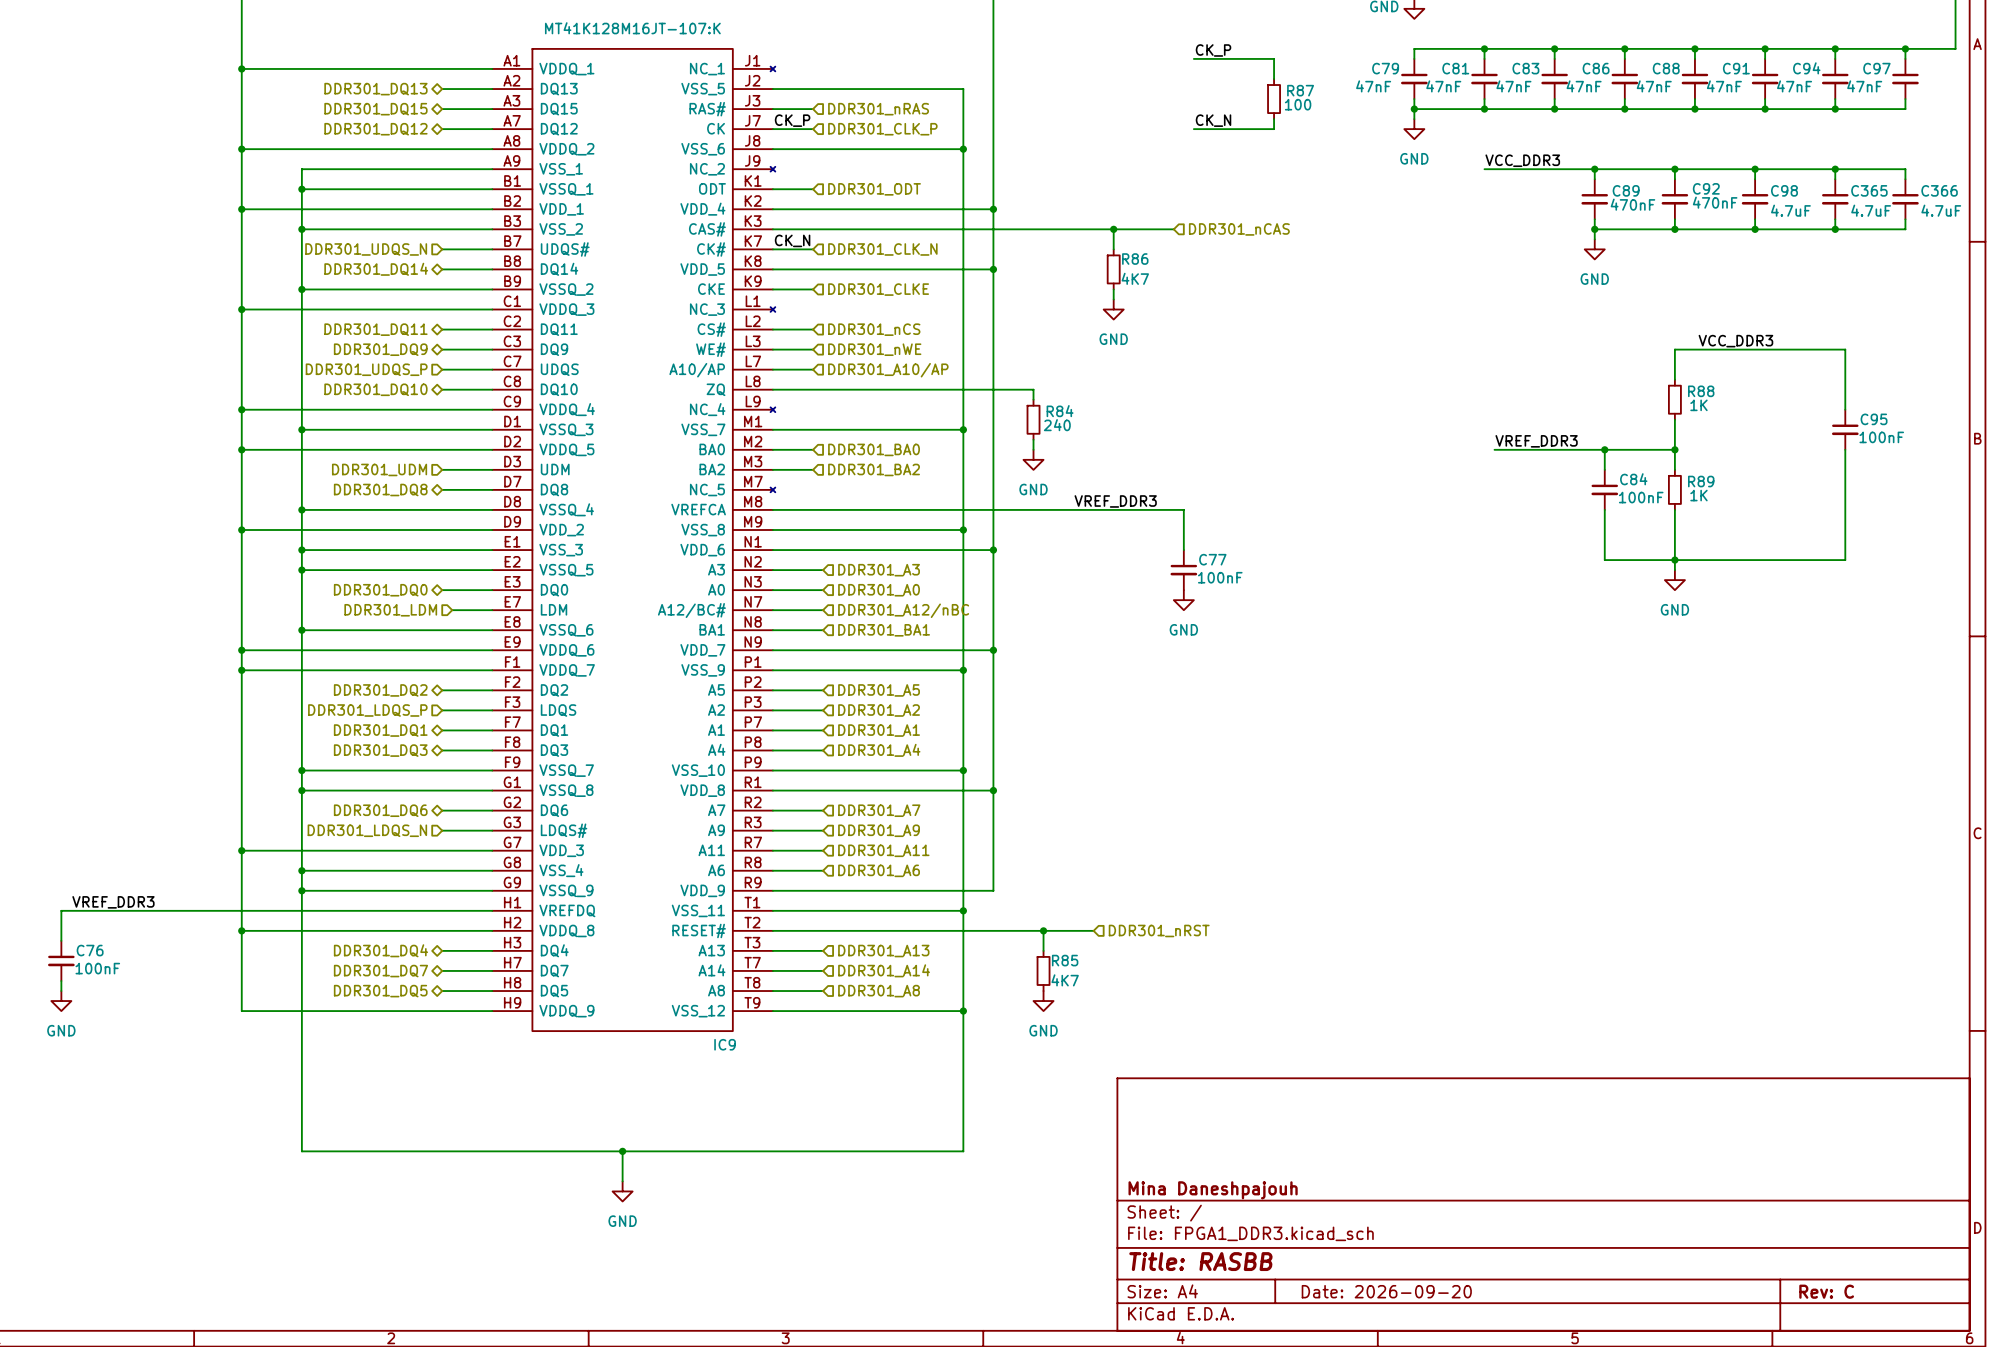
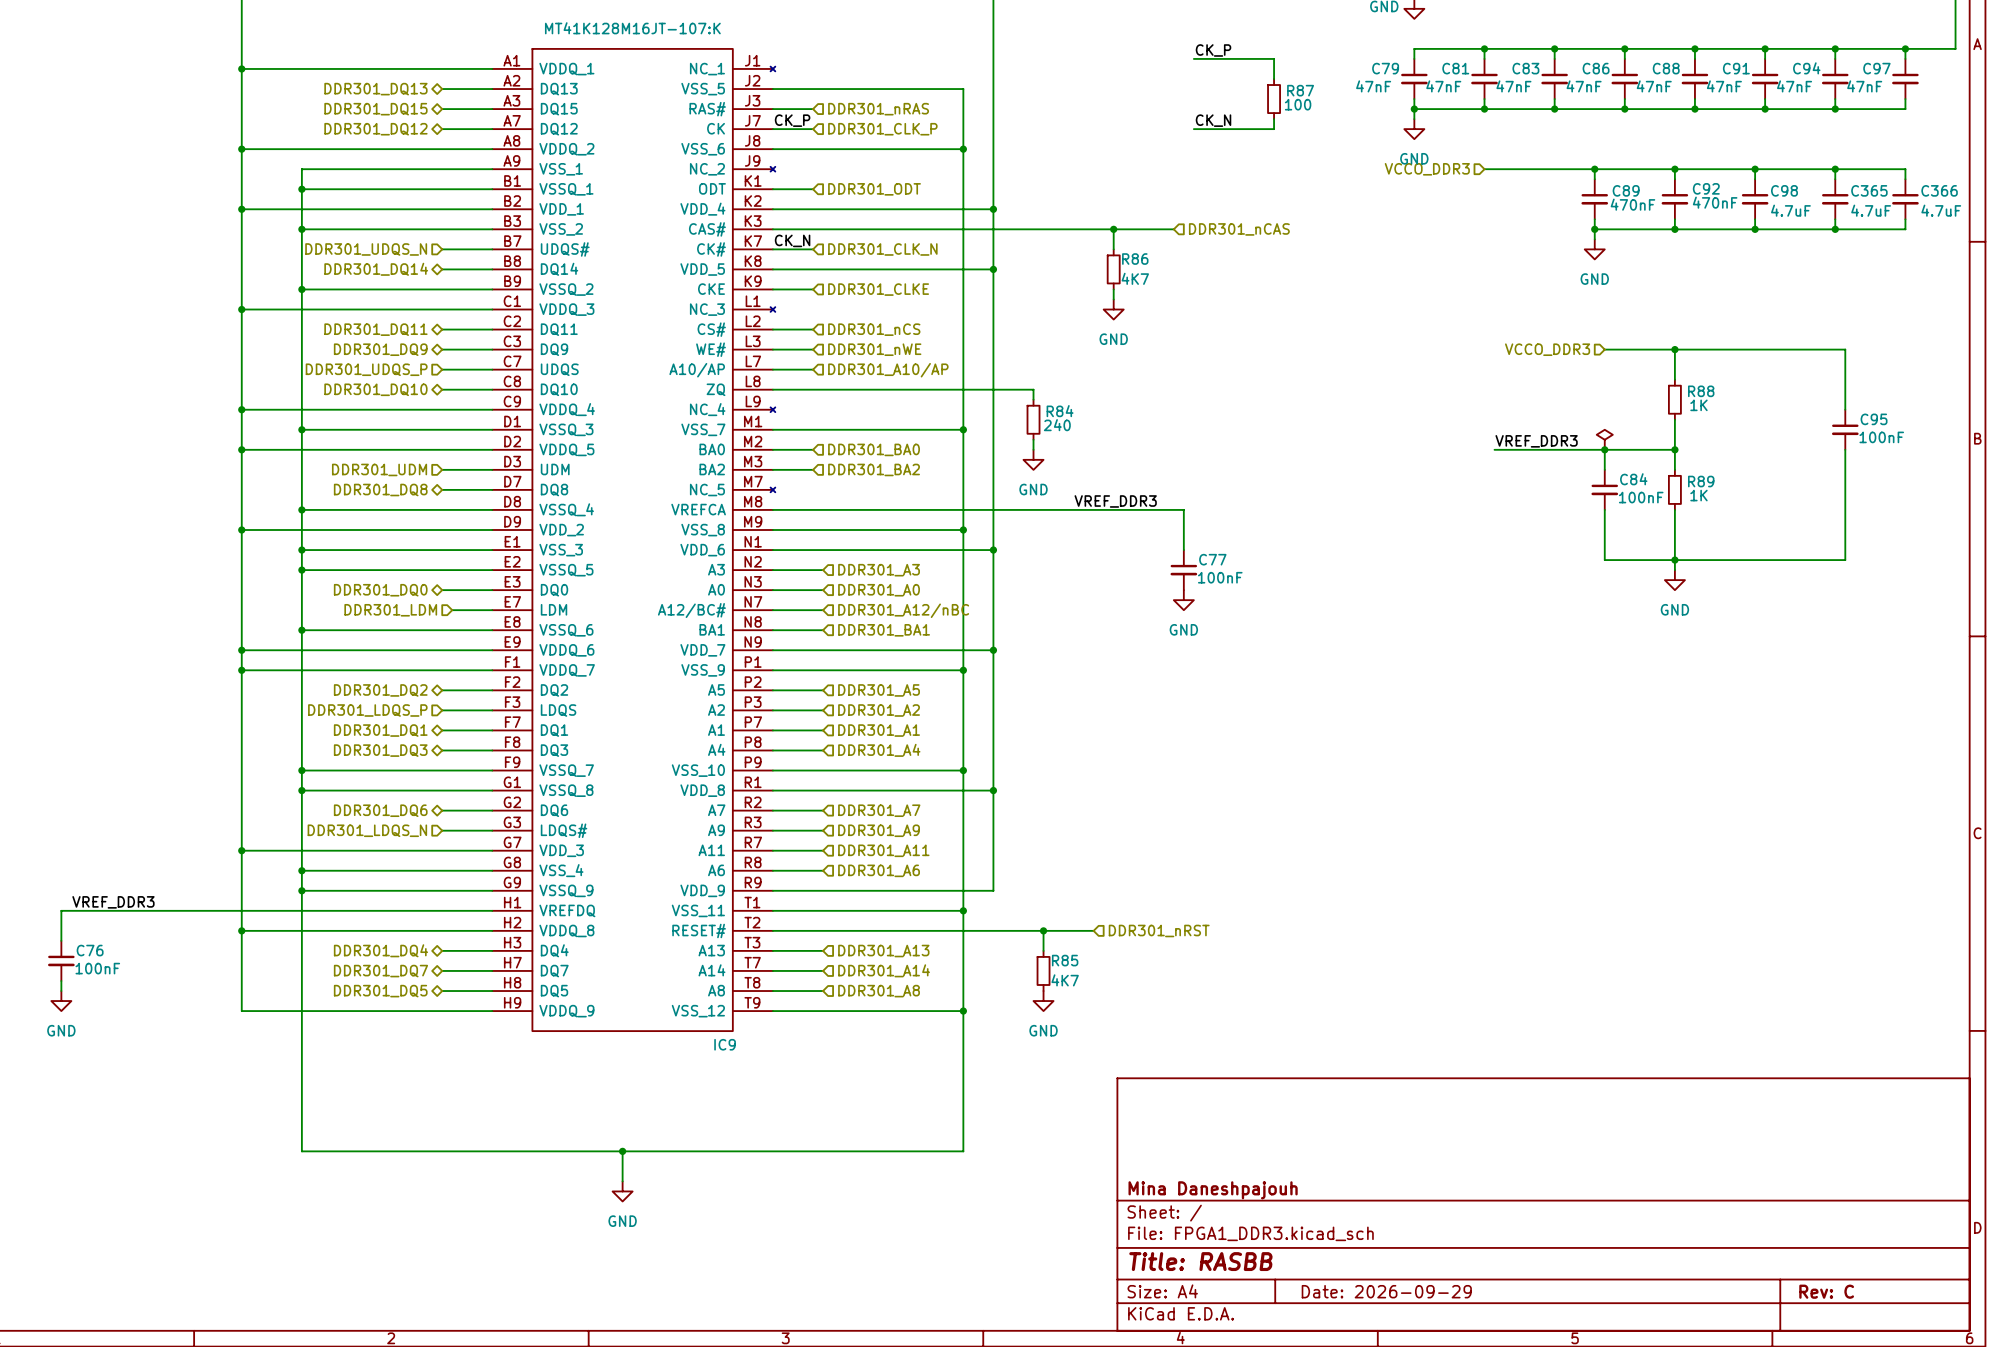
label: VCC_DDR3 (1522, 160) -> none
hierarchical label: none -> VCCO_DDR3 (1427, 169)
label: VCC_DDR3 (1735, 341) -> none
hierarchical label: none -> VCCO_DDR3 (1547, 349)
wire: none -> (1604, 349) (1674, 349)
junction: none -> (1674, 349)
power symbol: none -> (1604, 439)
title block: Date: 2026-09-20 (1386, 1291) -> Date: 2026-09-29 (1386, 1291)

